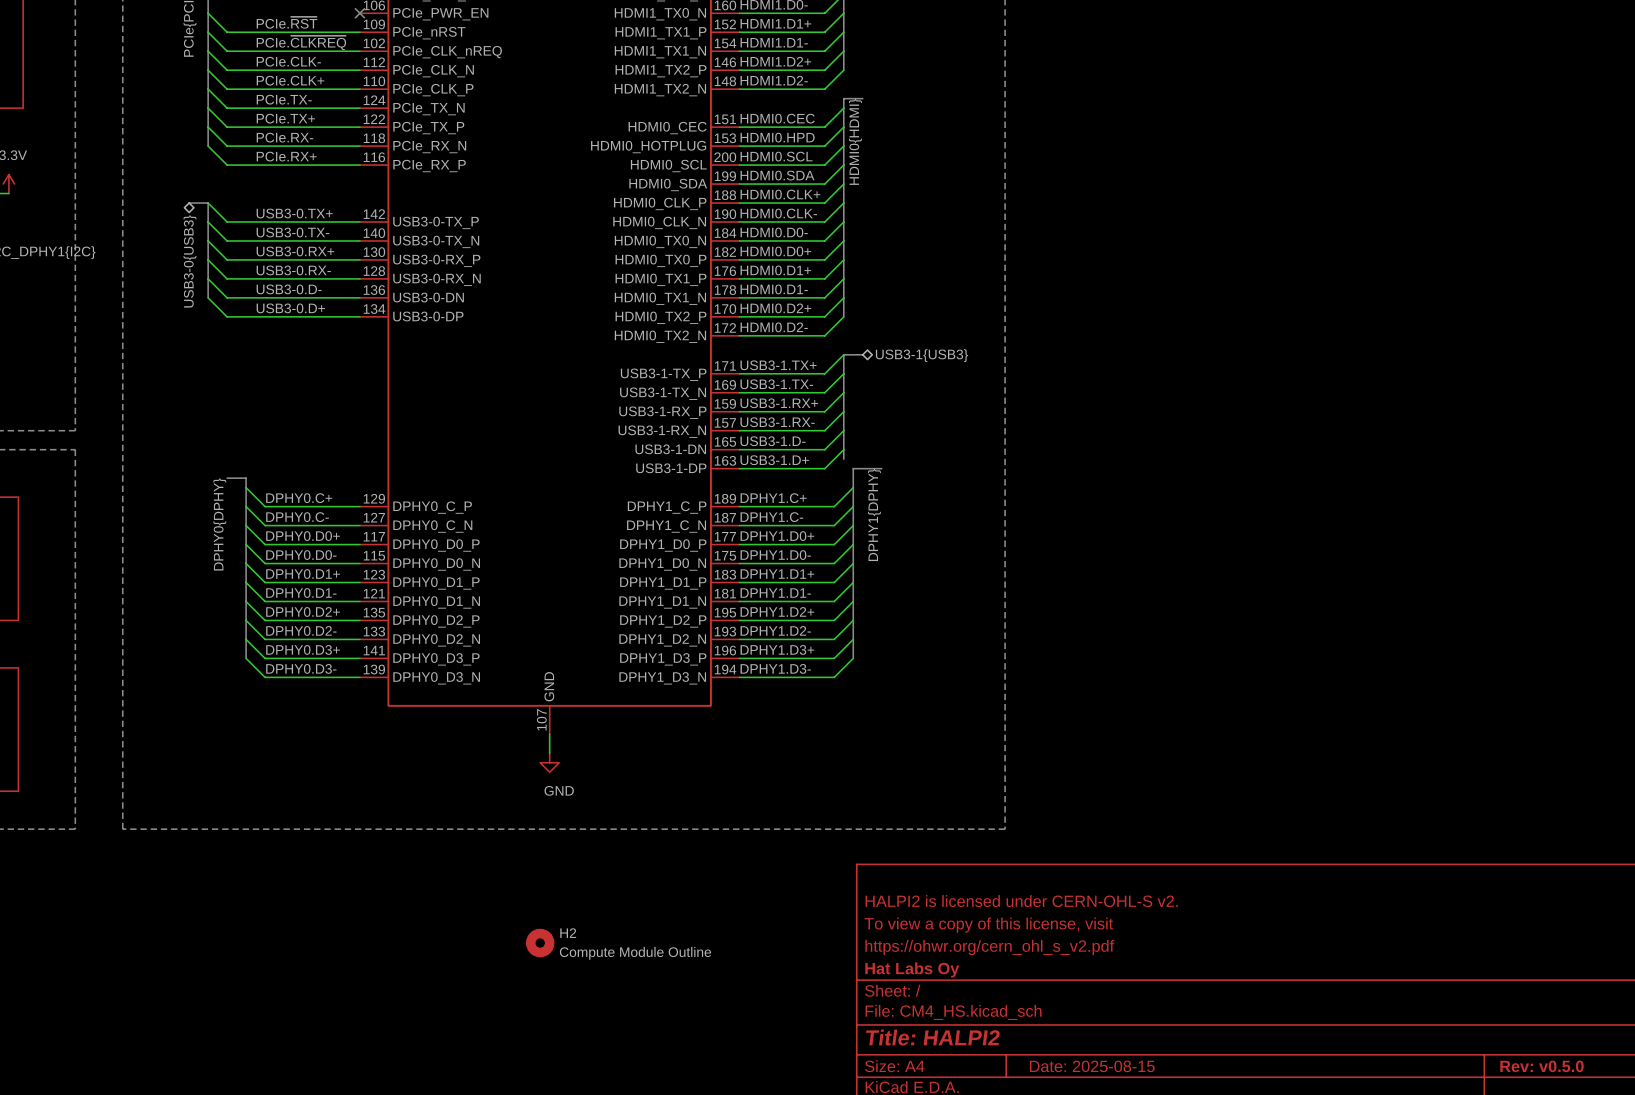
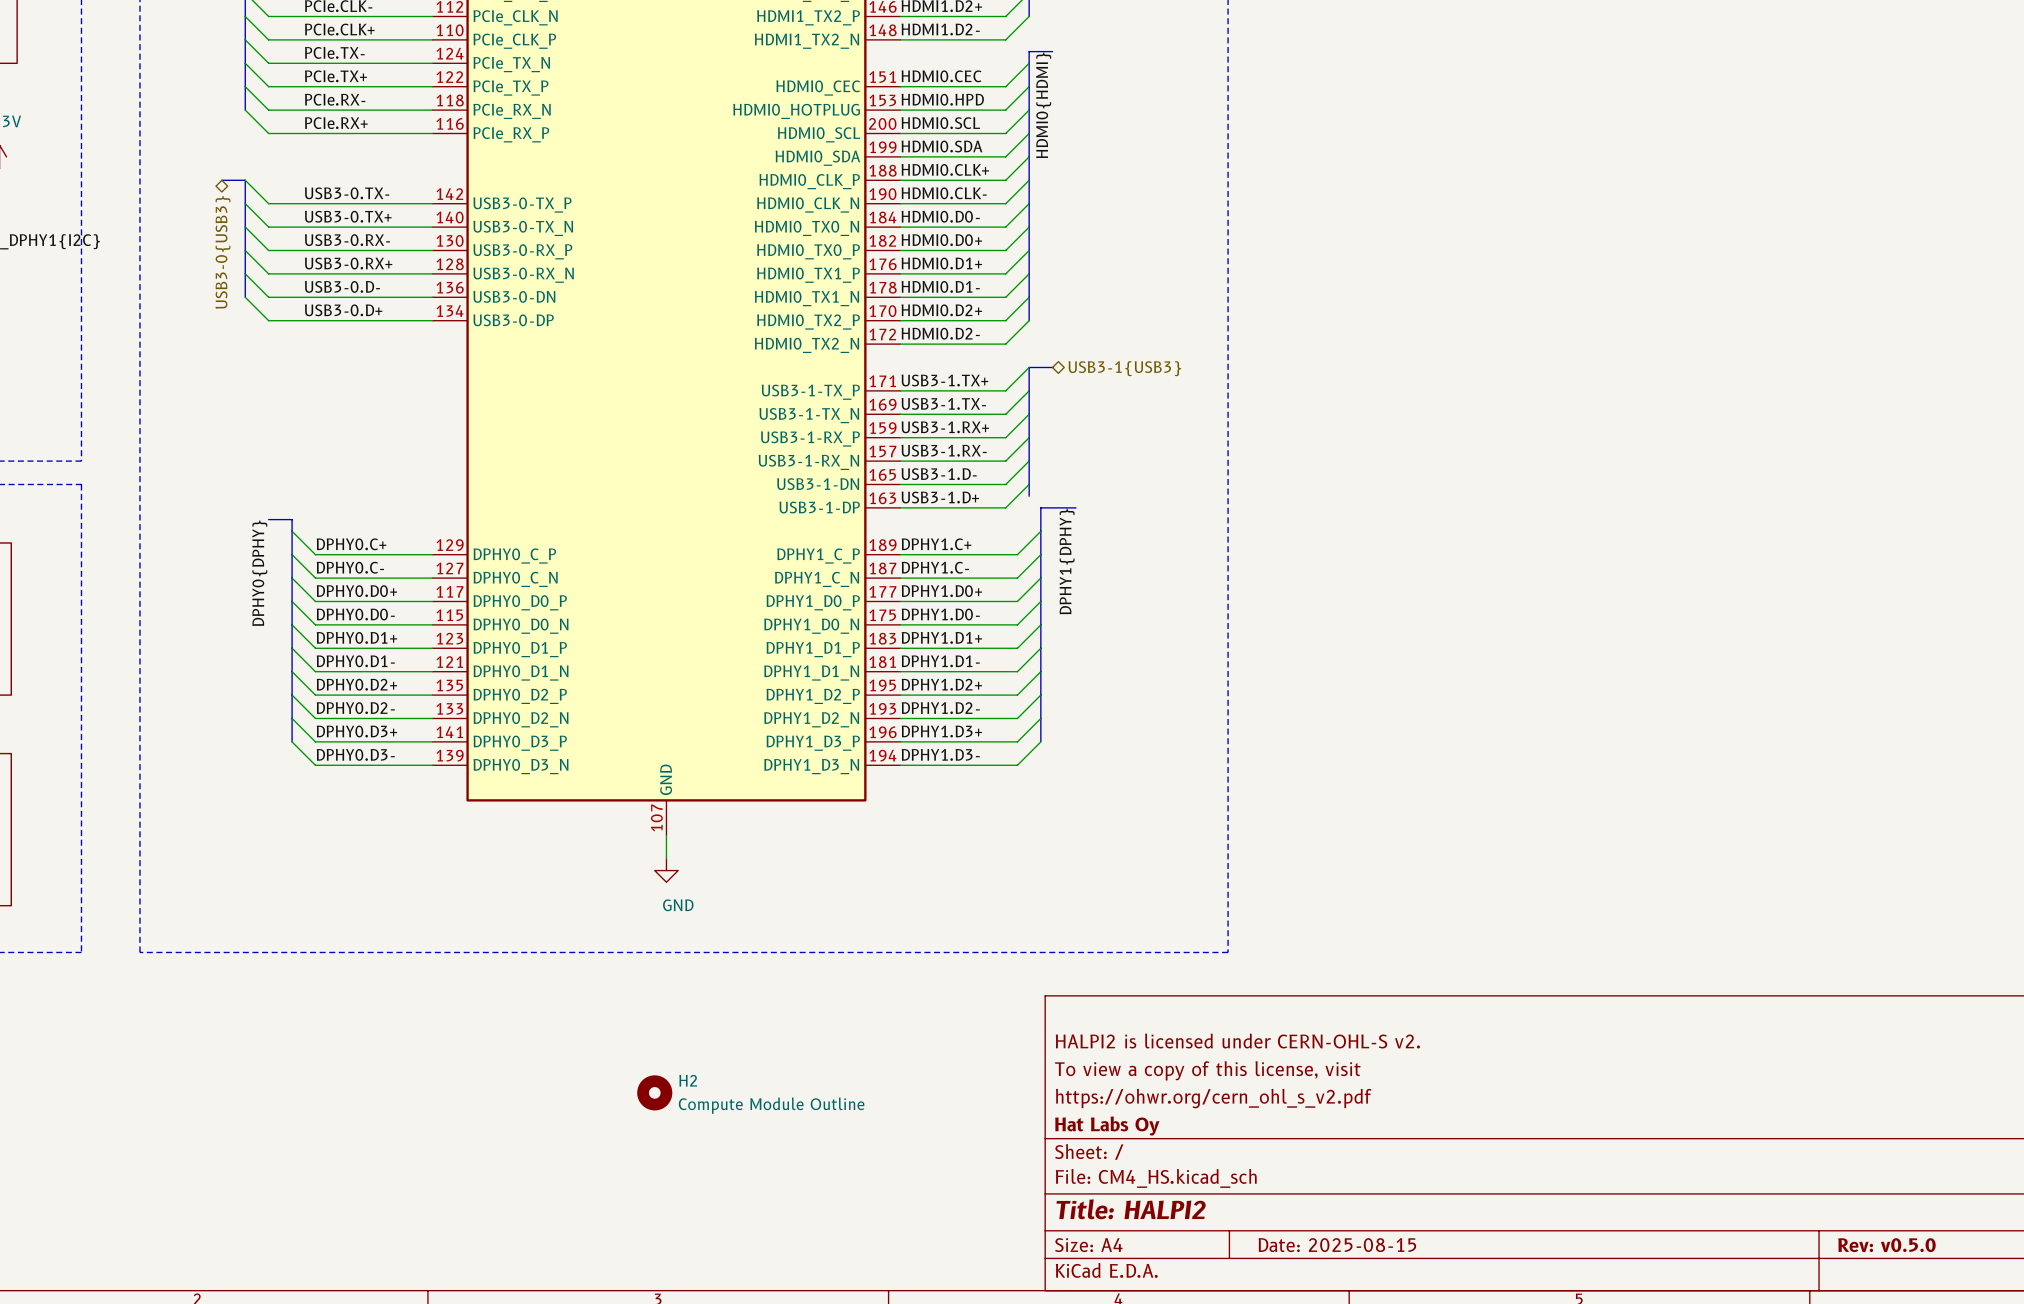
label: USB3-0.TX+ (294, 213) -> USB3-0.TX- (347, 193)
label: USB3-0.TX- (292, 232) -> USB3-0.TX+ (348, 216)
label: USB3-0.RX+ (295, 251) -> USB3-0.RX- (347, 240)
label: USB3-0.RX- (293, 270) -> USB3-0.RX+ (348, 263)

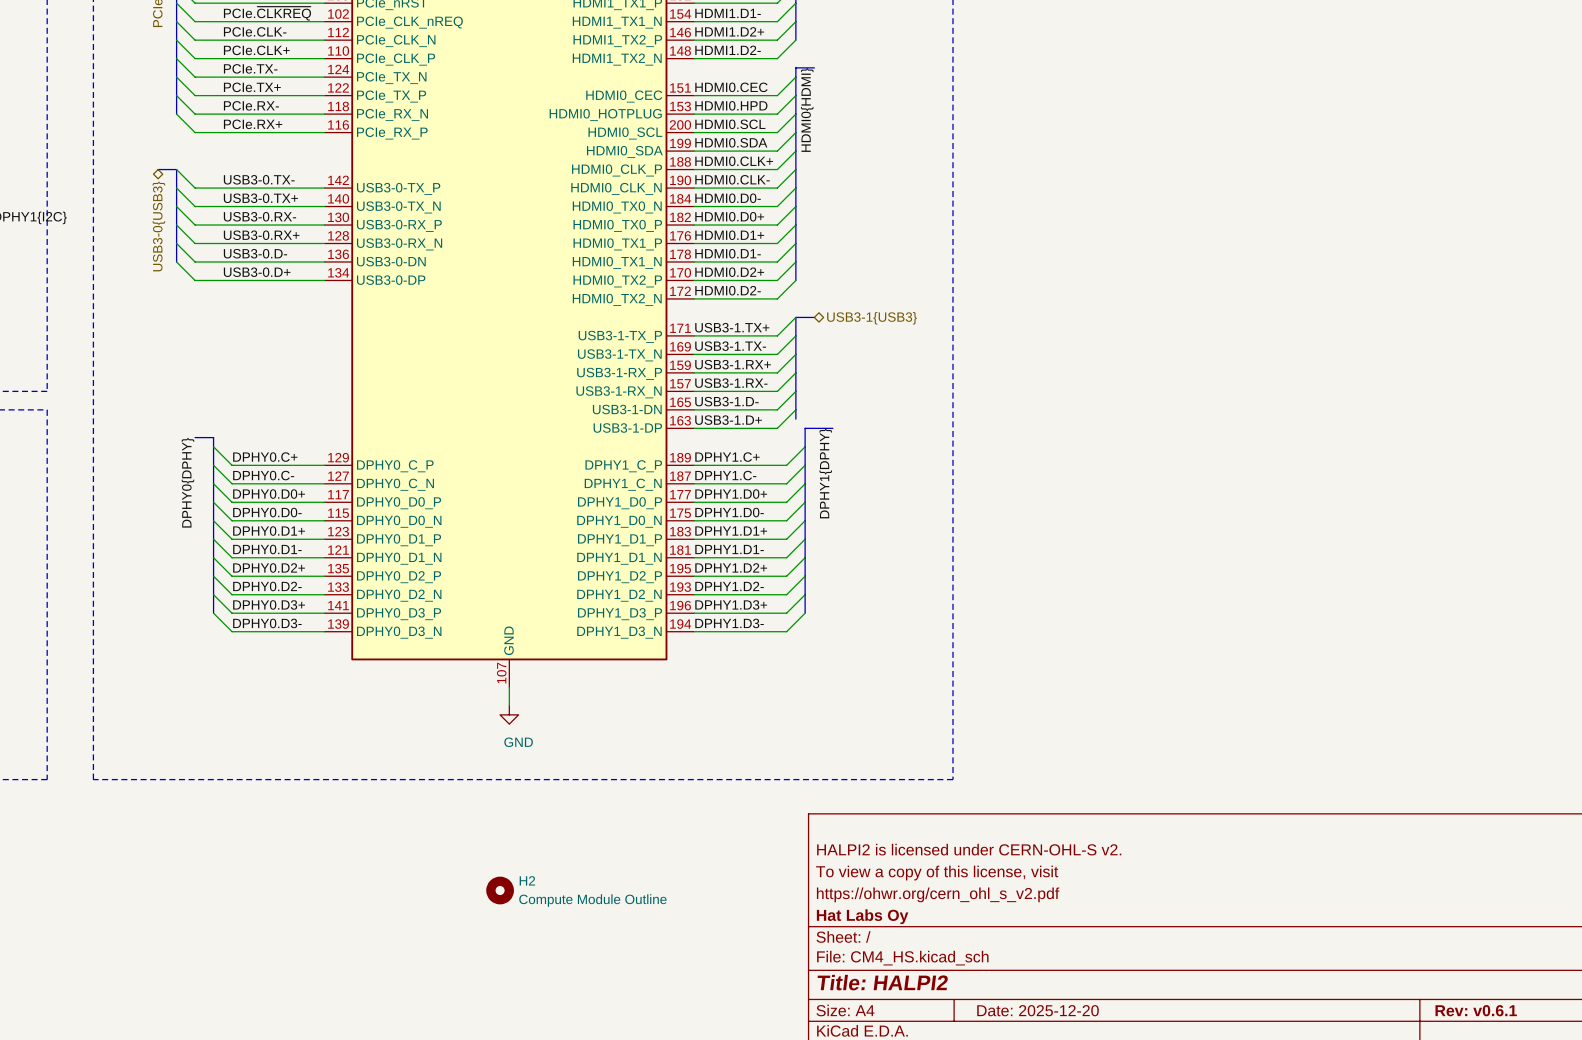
title block: Date: 2025-08-15 (1337, 1245) -> Date: 2025-12-20 (1038, 1010)
title block: Rev: v0.5.0 (1886, 1245) -> Rev: v0.6.1 (1476, 1010)

